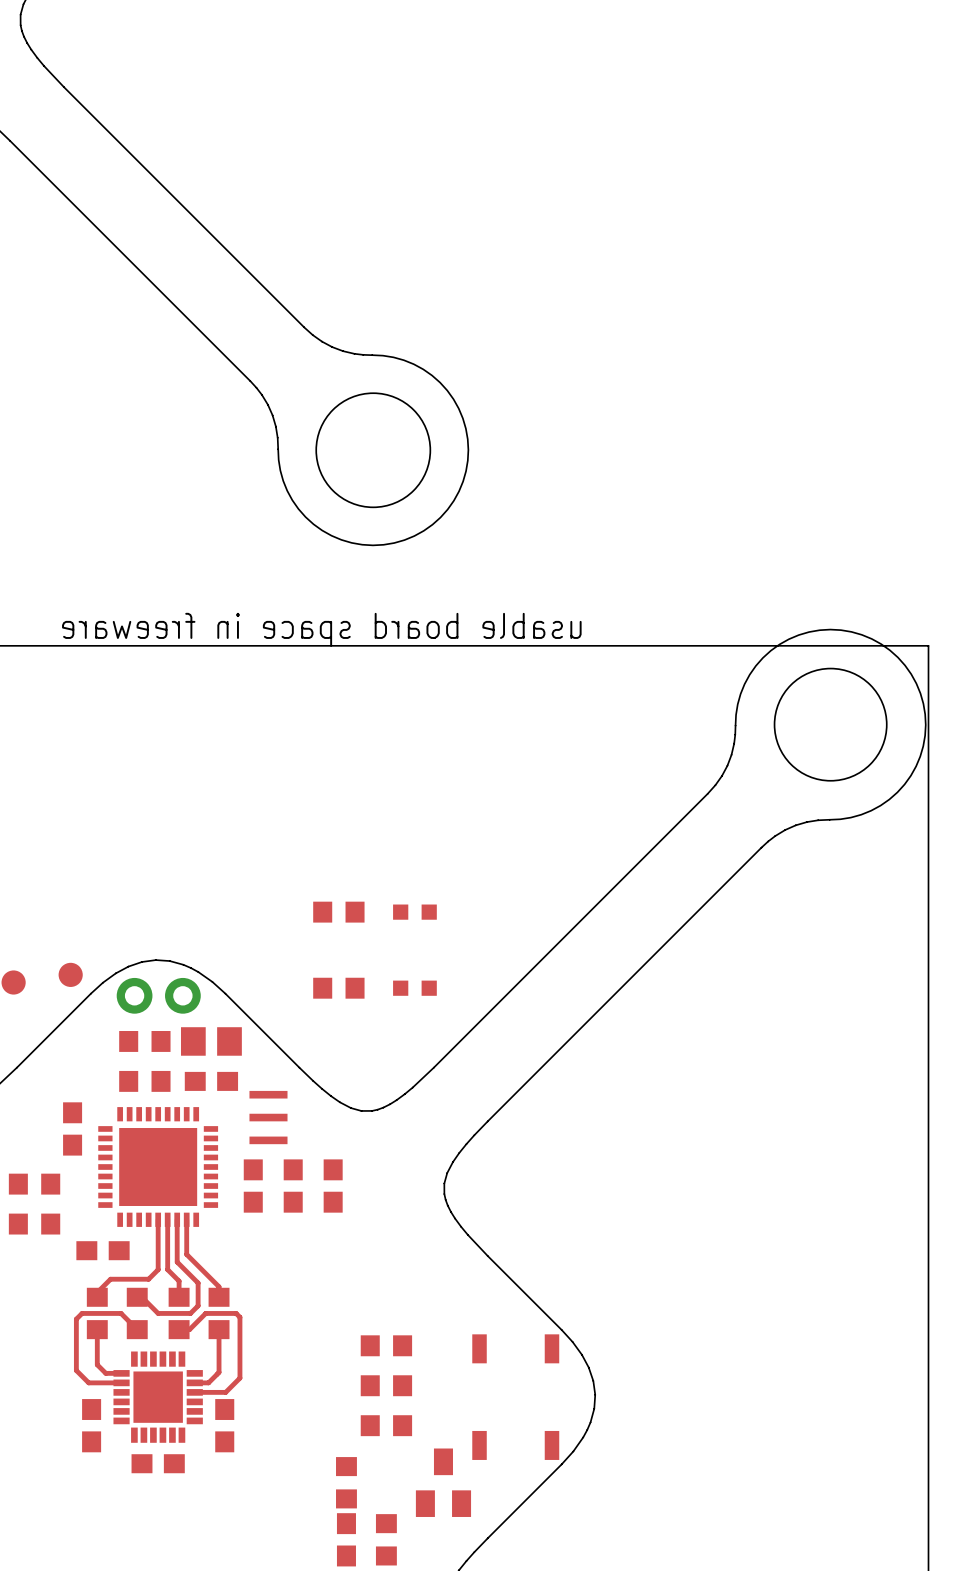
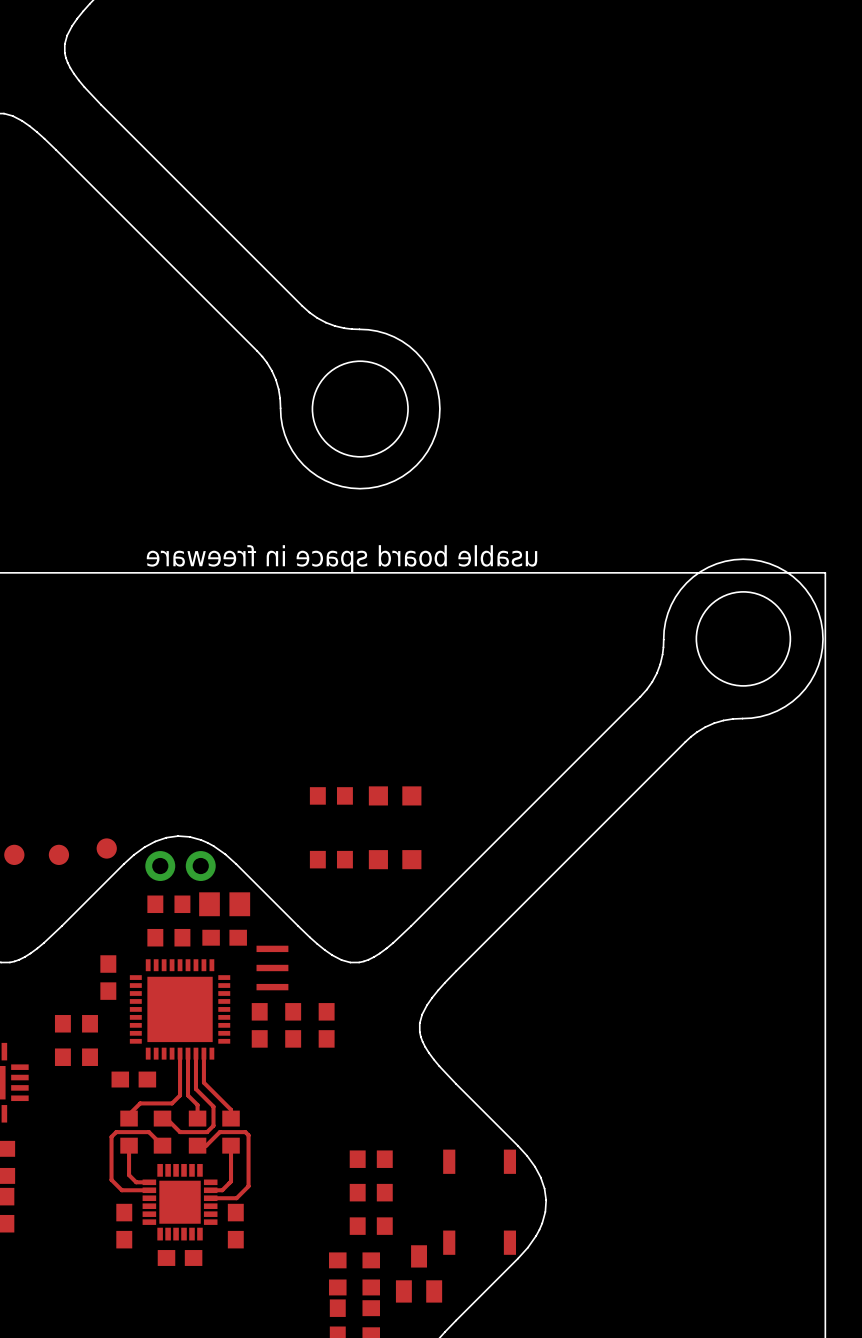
part footprint: [393, 904, 437, 920] -> [368, 786, 422, 806]
part footprint: [393, 980, 437, 996] -> [368, 850, 422, 870]
part: none -> (371, 1273)

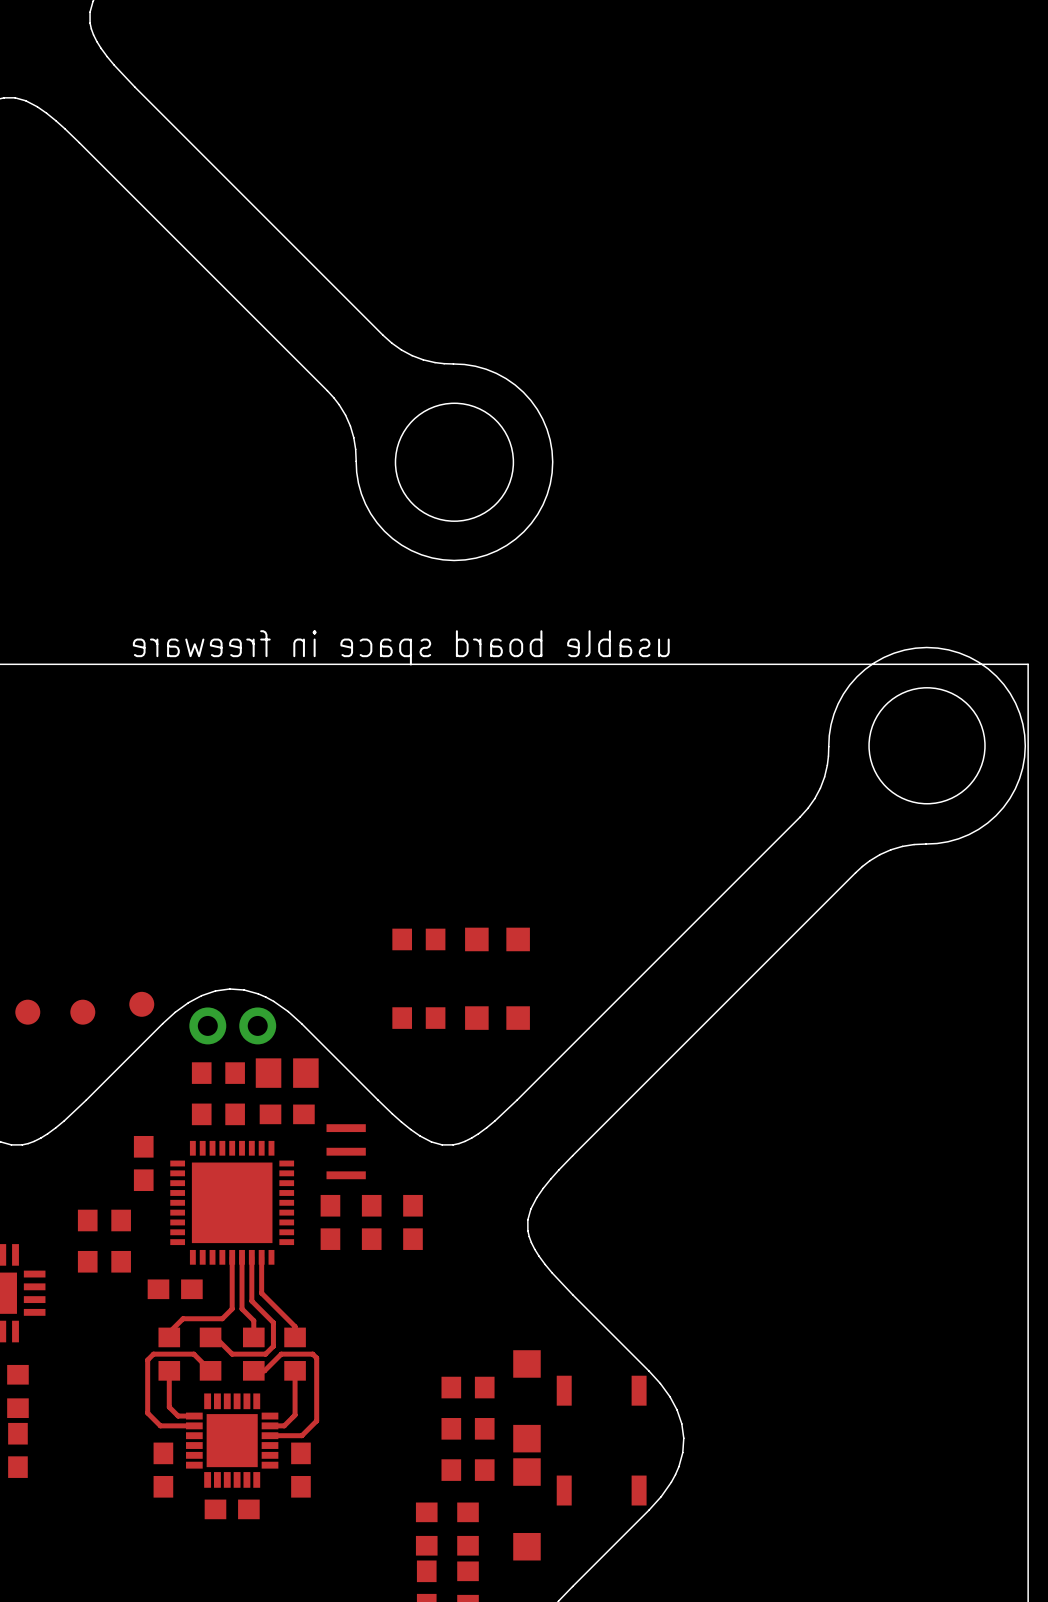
part: none -> (526, 1401)
part footprint: [395, 1245, 443, 1303] -> [513, 1458, 541, 1561]

